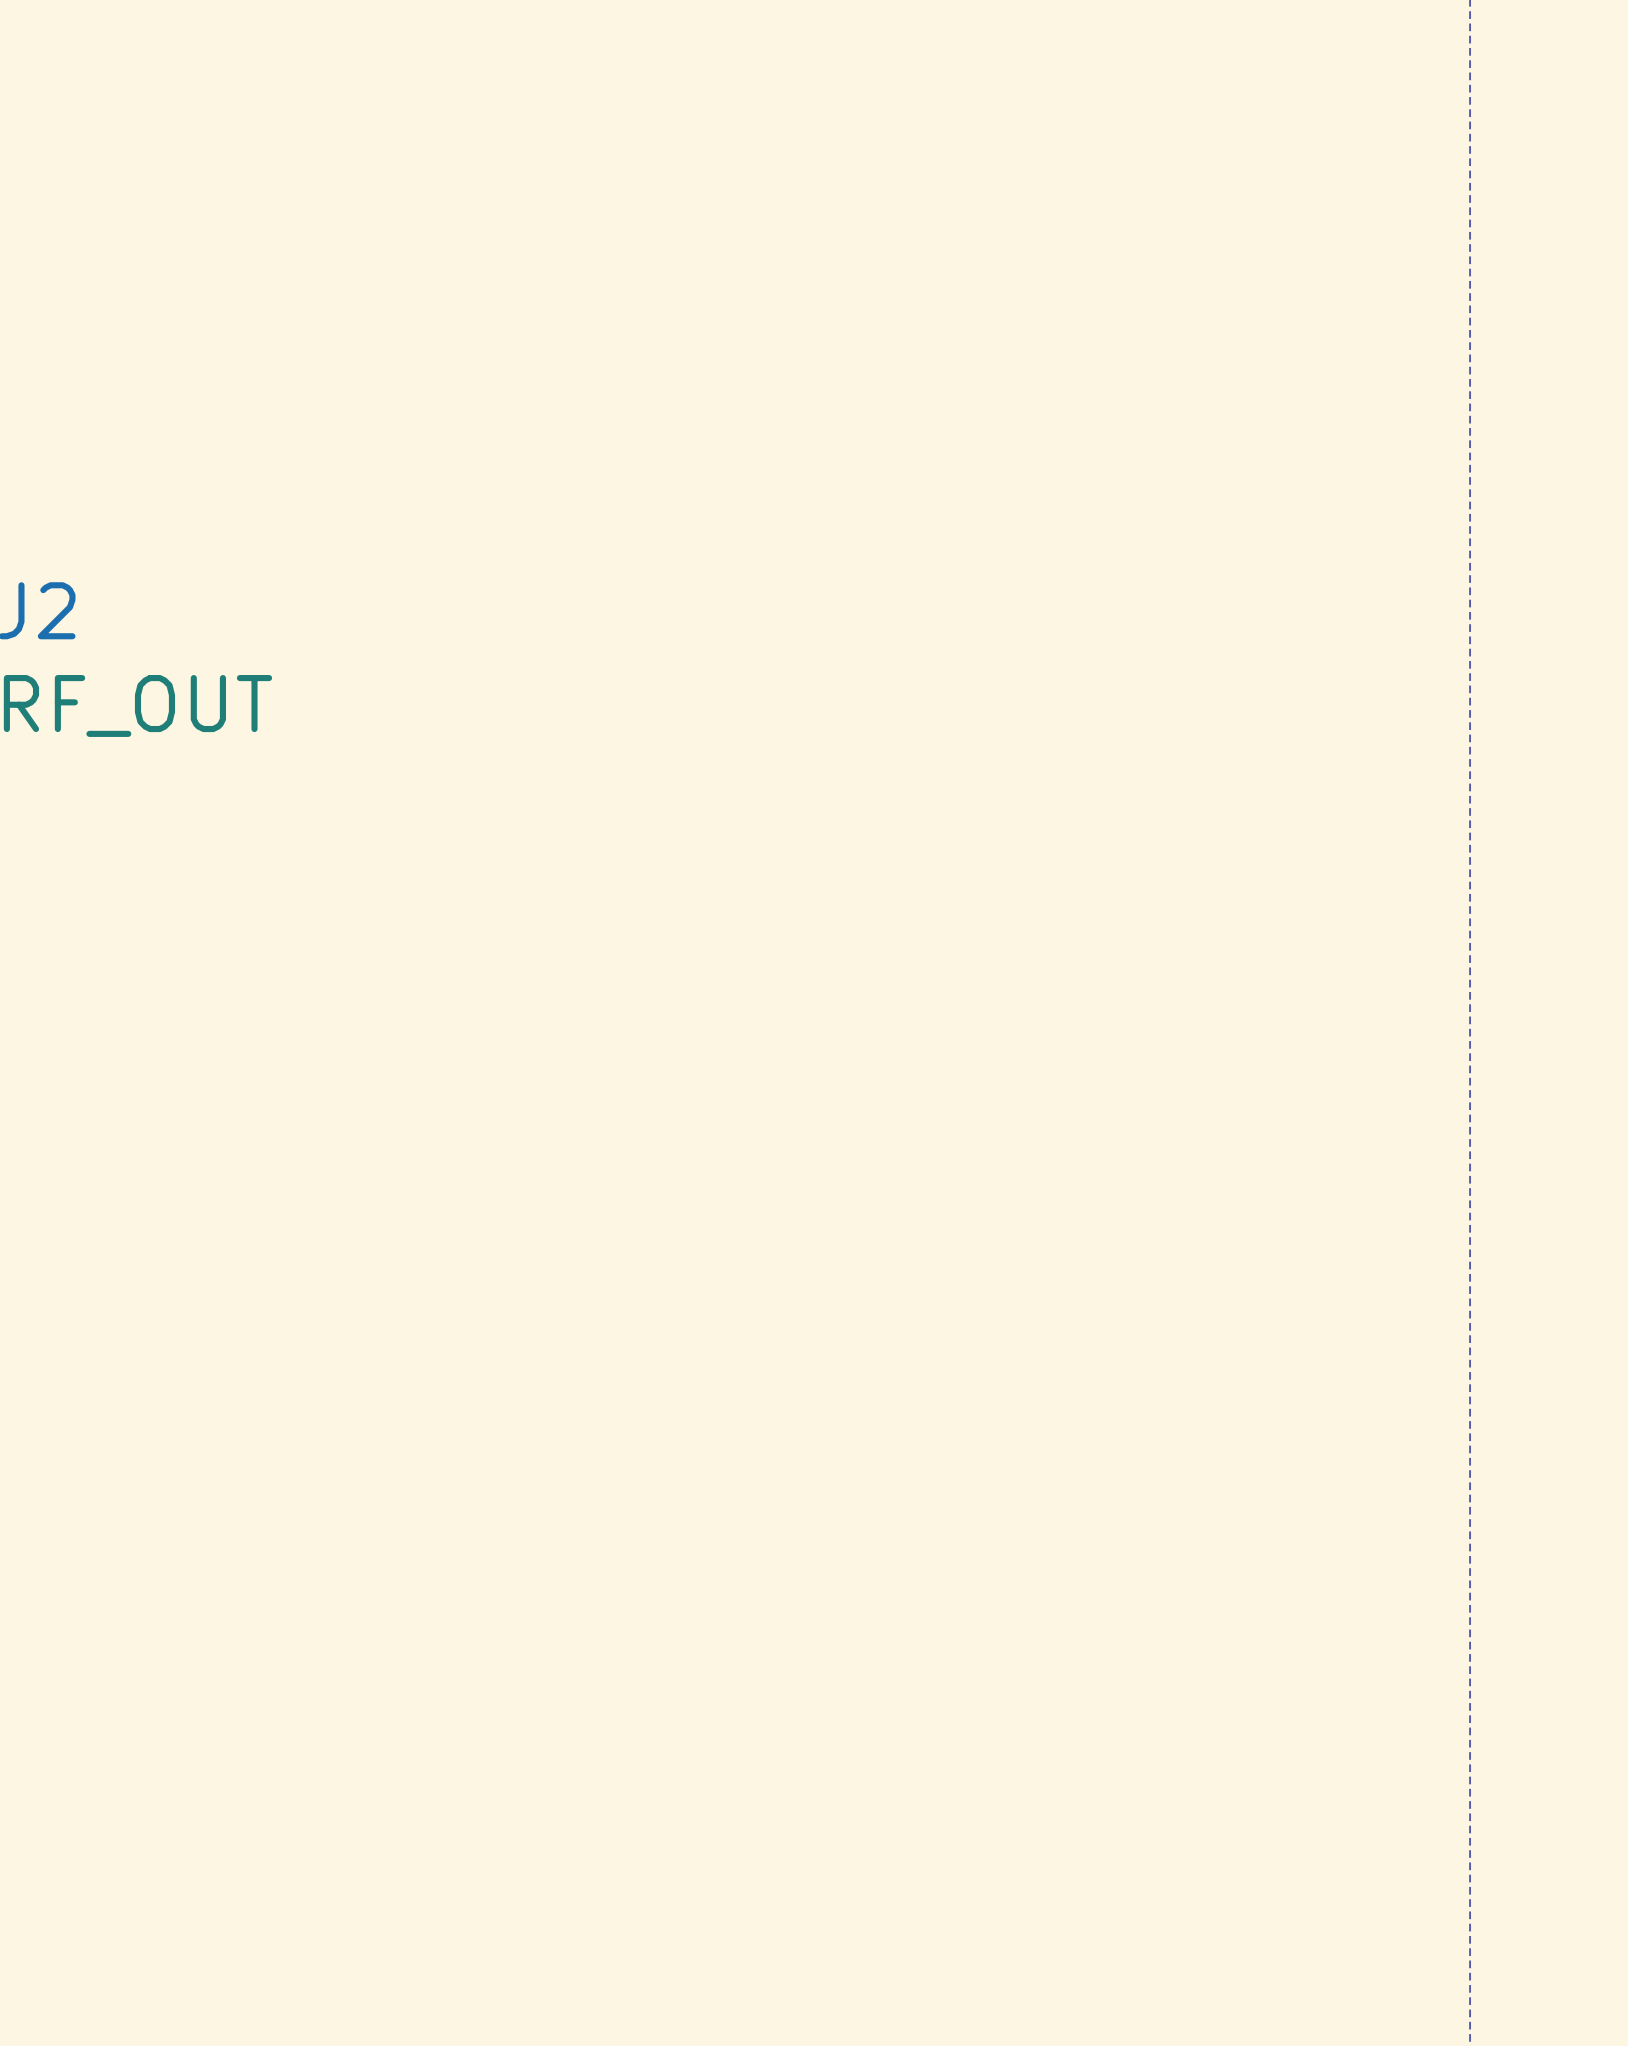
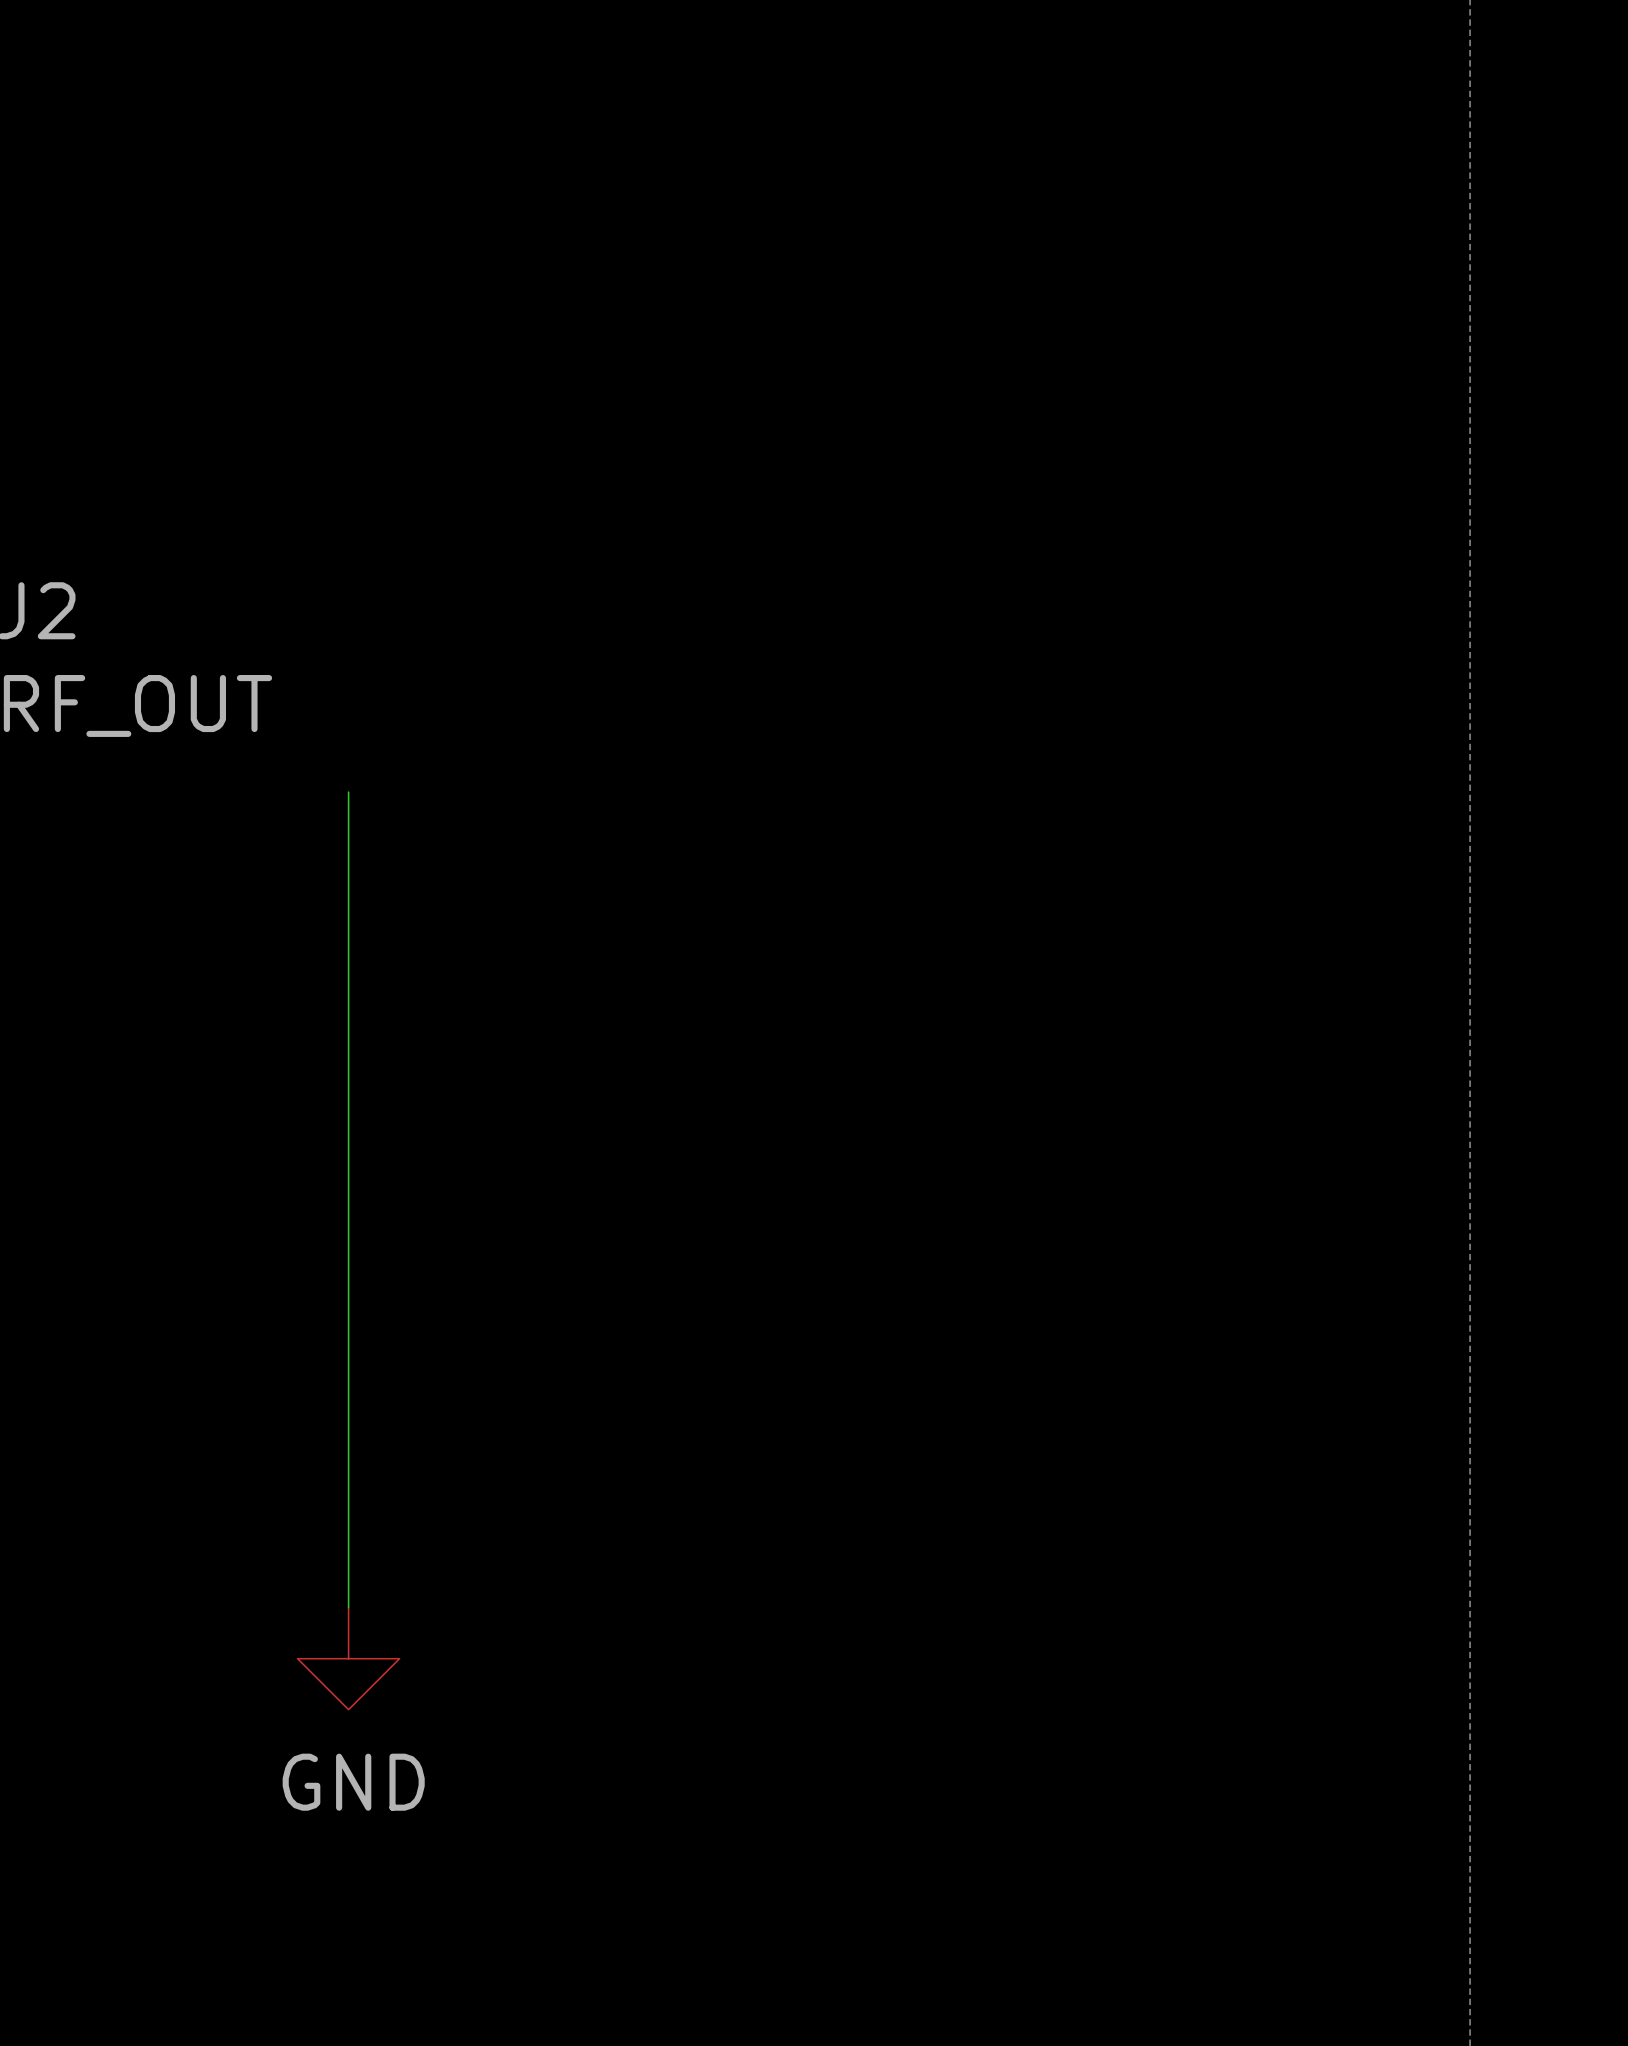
wire: none -> (348, 792) (348, 1607)
power symbol: none -> GND (348, 1658)

